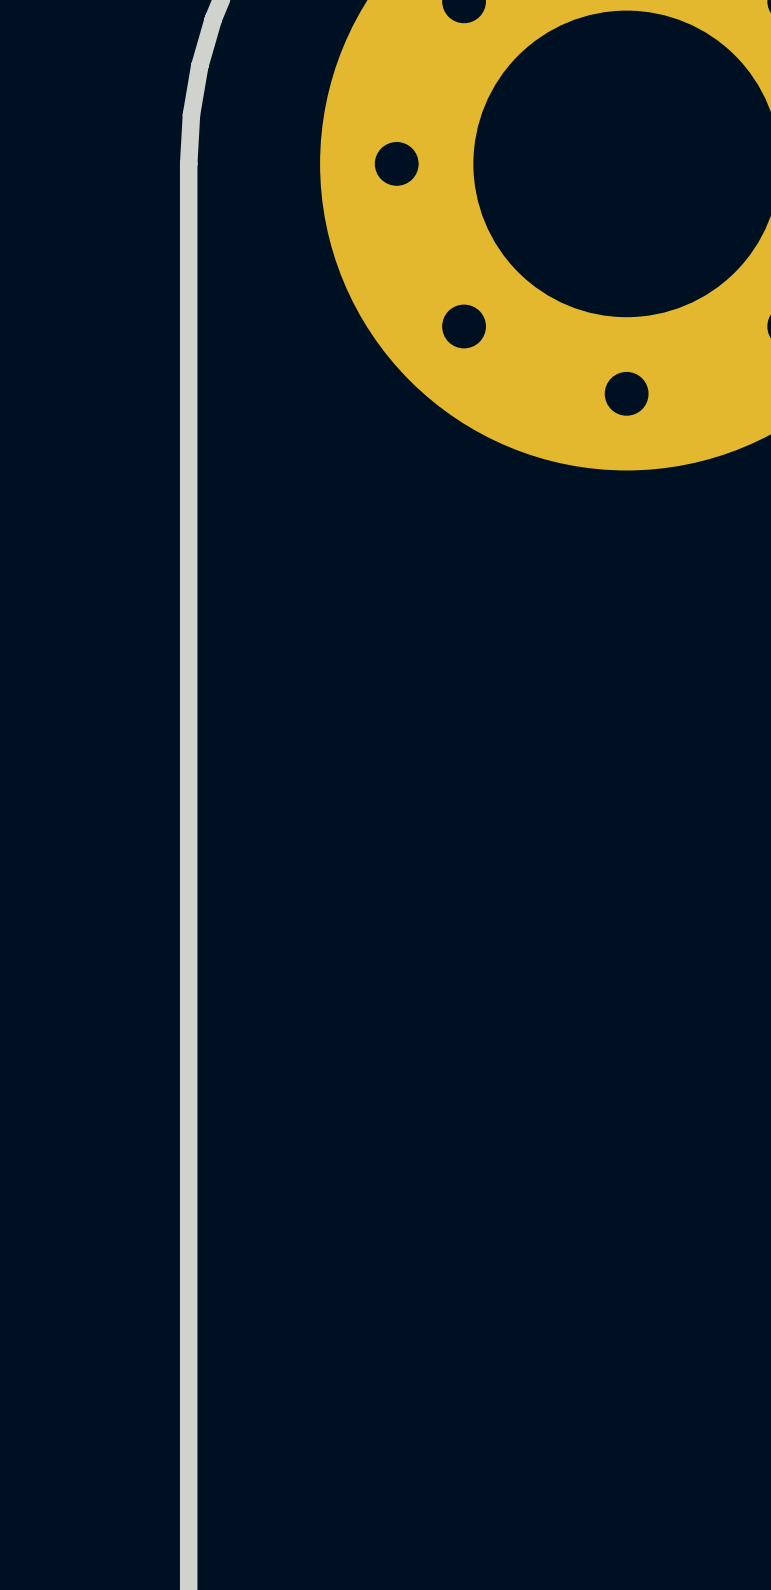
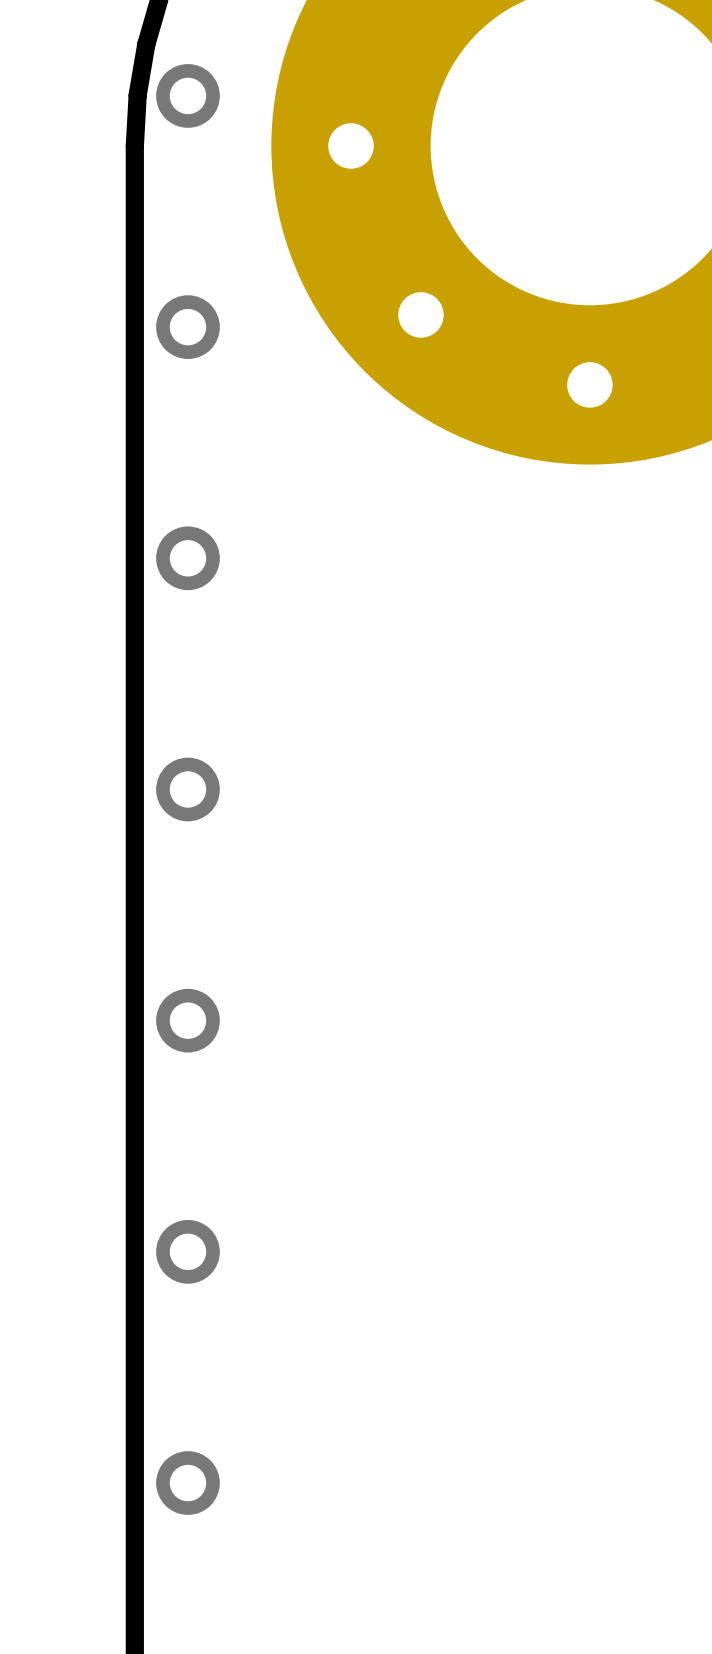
via: none -> (187, 95)
via: none -> (187, 327)
via: none -> (187, 558)
via: none -> (187, 789)
via: none -> (187, 1020)
via: none -> (187, 1251)
via: none -> (187, 1483)

